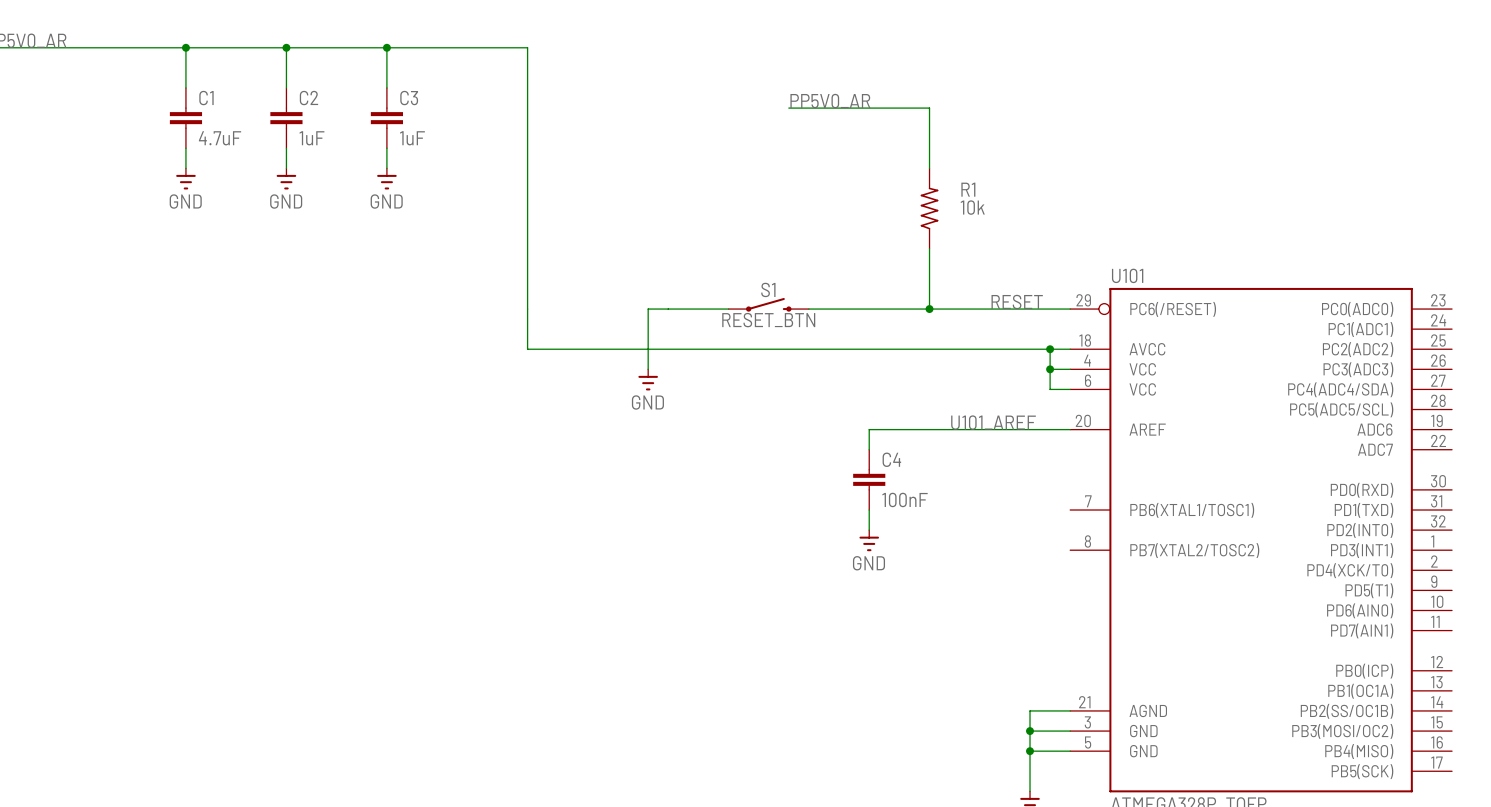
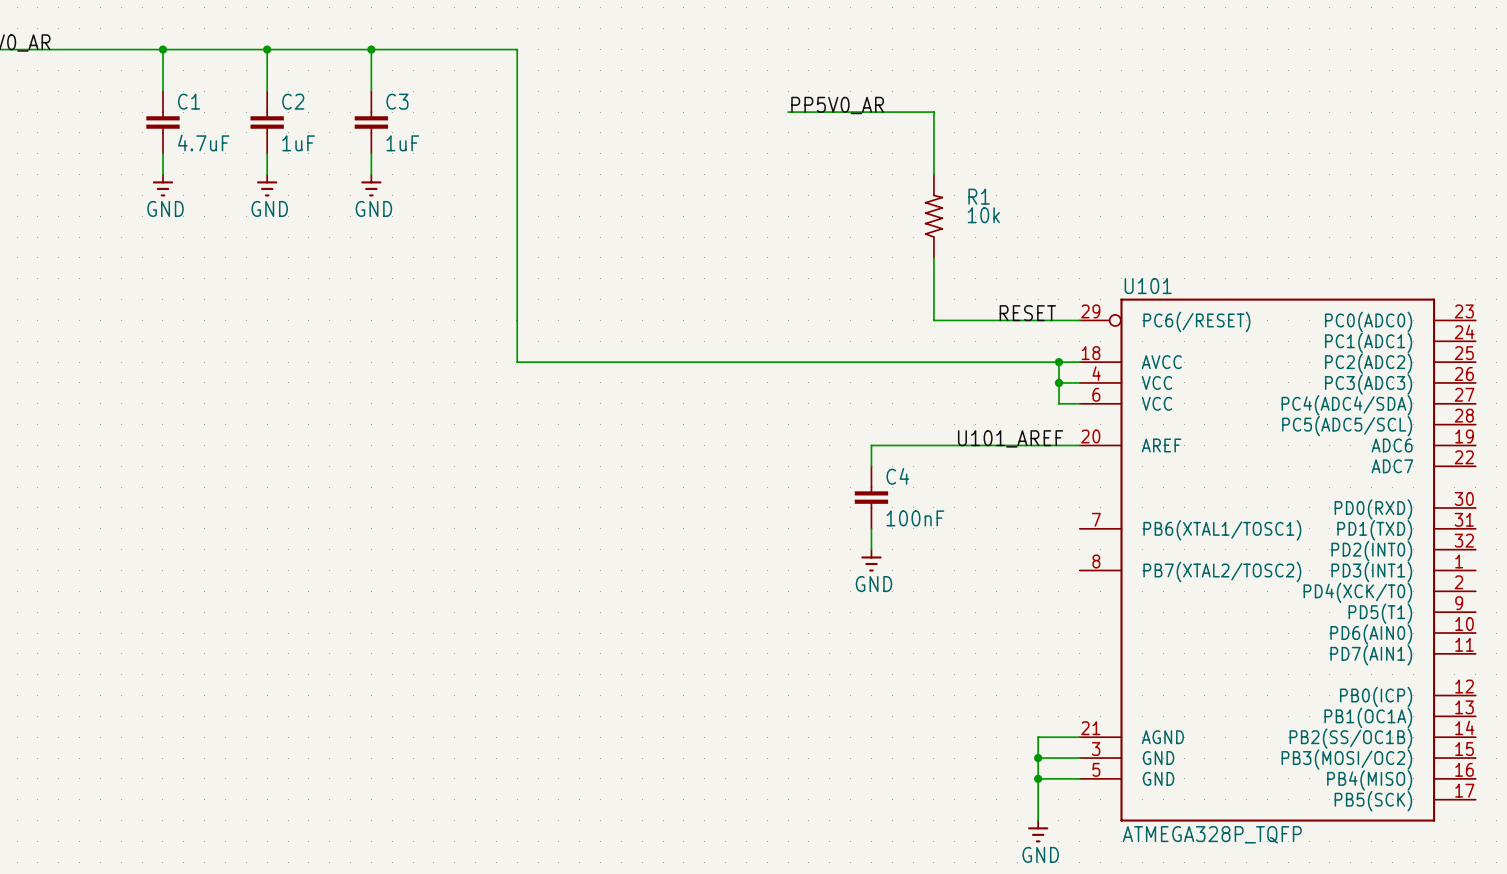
S1: RESET_BTN (768, 304) -> none
wire: (728, 309) (648, 309) (648, 369) -> none
wire: (808, 309) (929, 309) -> none
junction: (929, 309) -> none
power symbol: GND (648, 379) -> none

